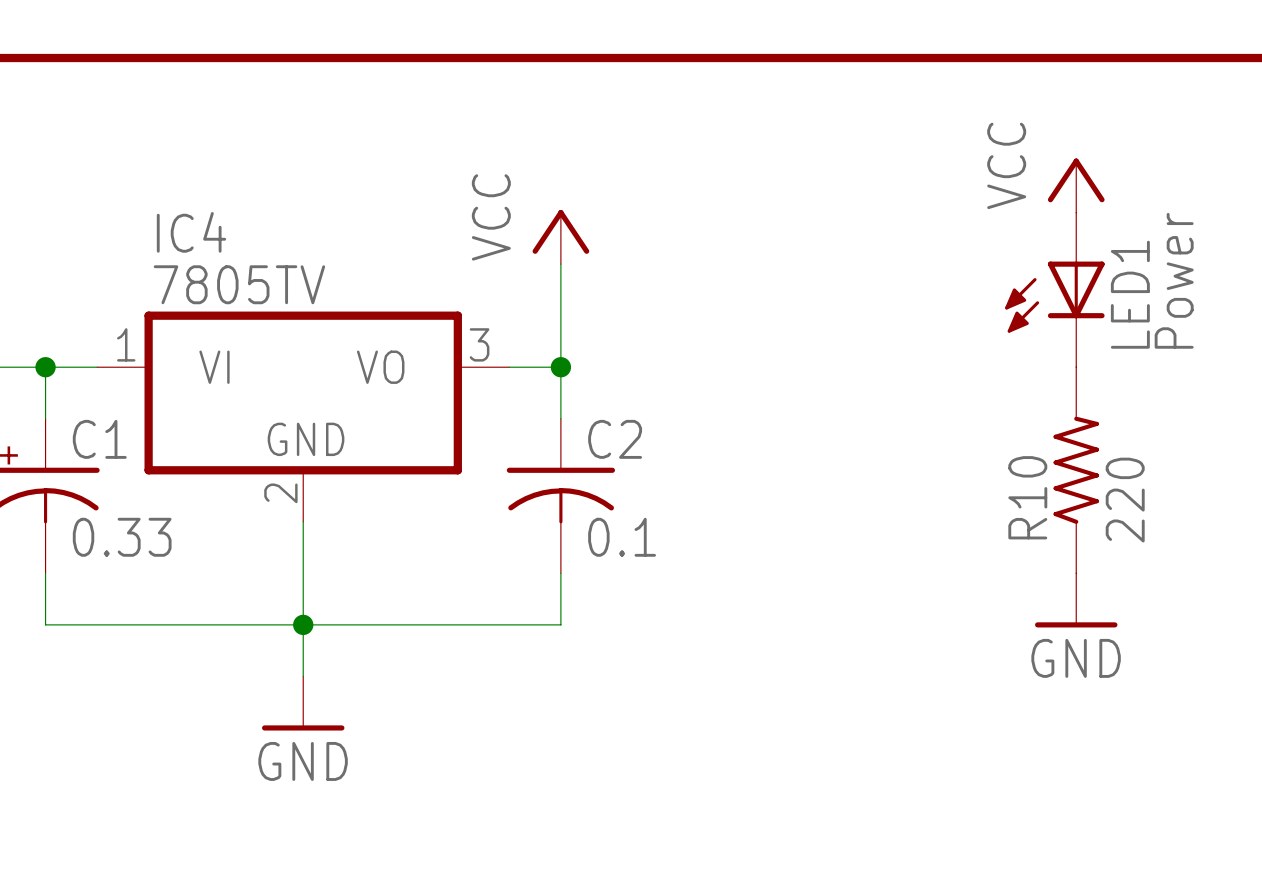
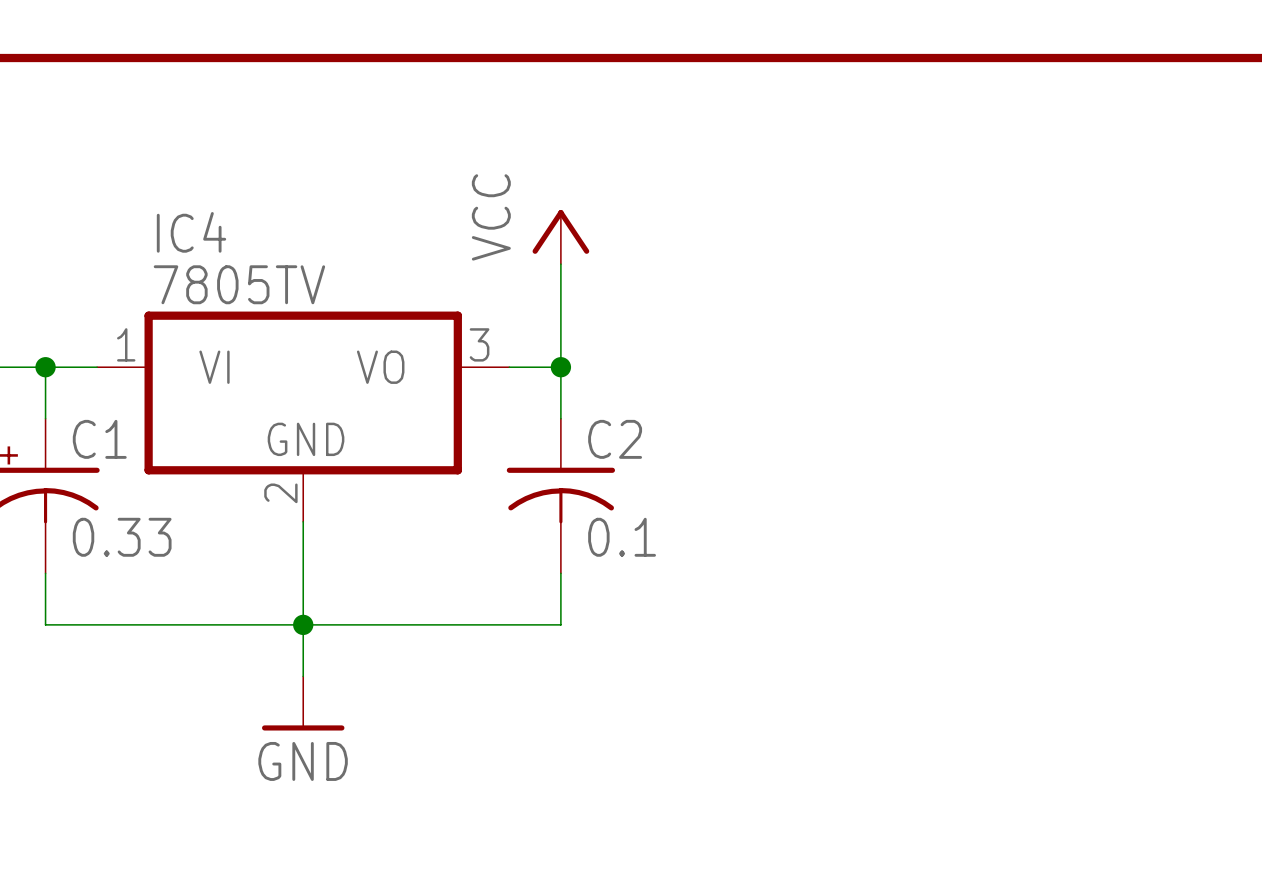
power symbol: VCC (1076, 185) -> none
LED1: Power (1054, 289) -> none
R10: 220 (1076, 470) -> none
power symbol: GND (1076, 600) -> none

